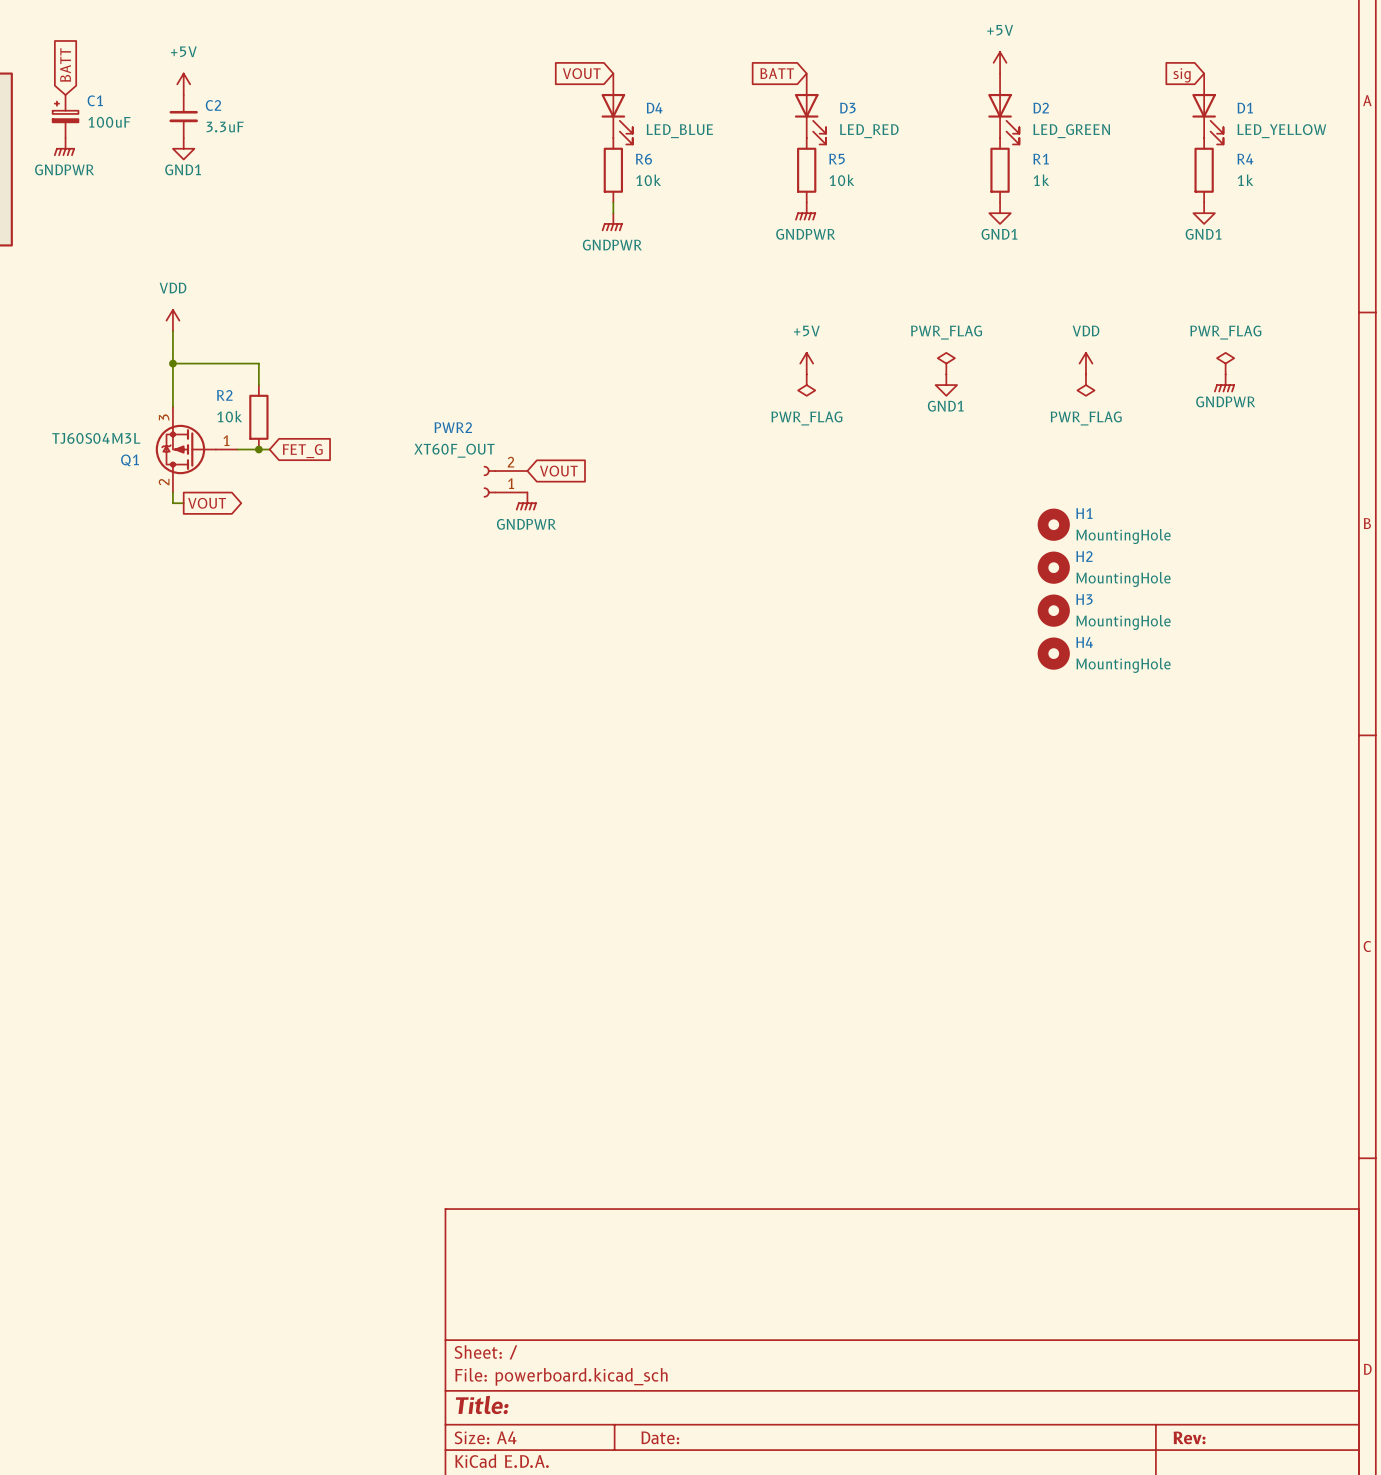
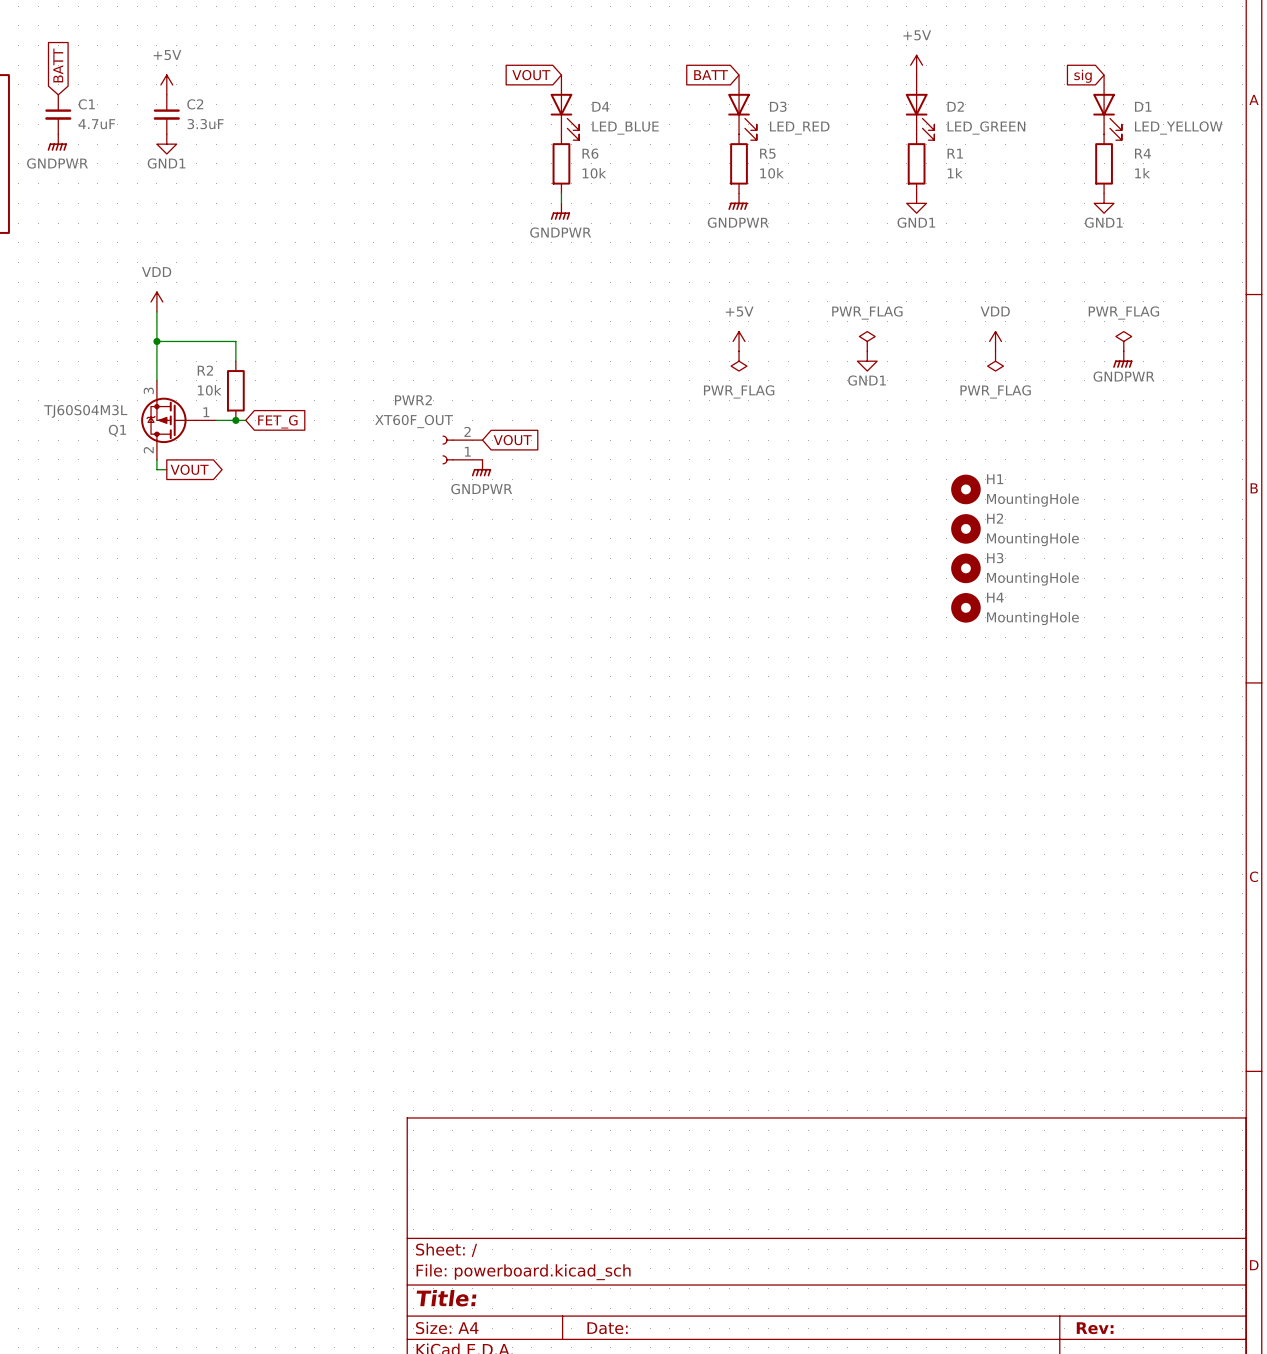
C1 symbol: [52, 95, 79, 139] -> [45, 94, 72, 135]
C1 value: 100uF (109, 122) -> 4.7uF (96, 124)

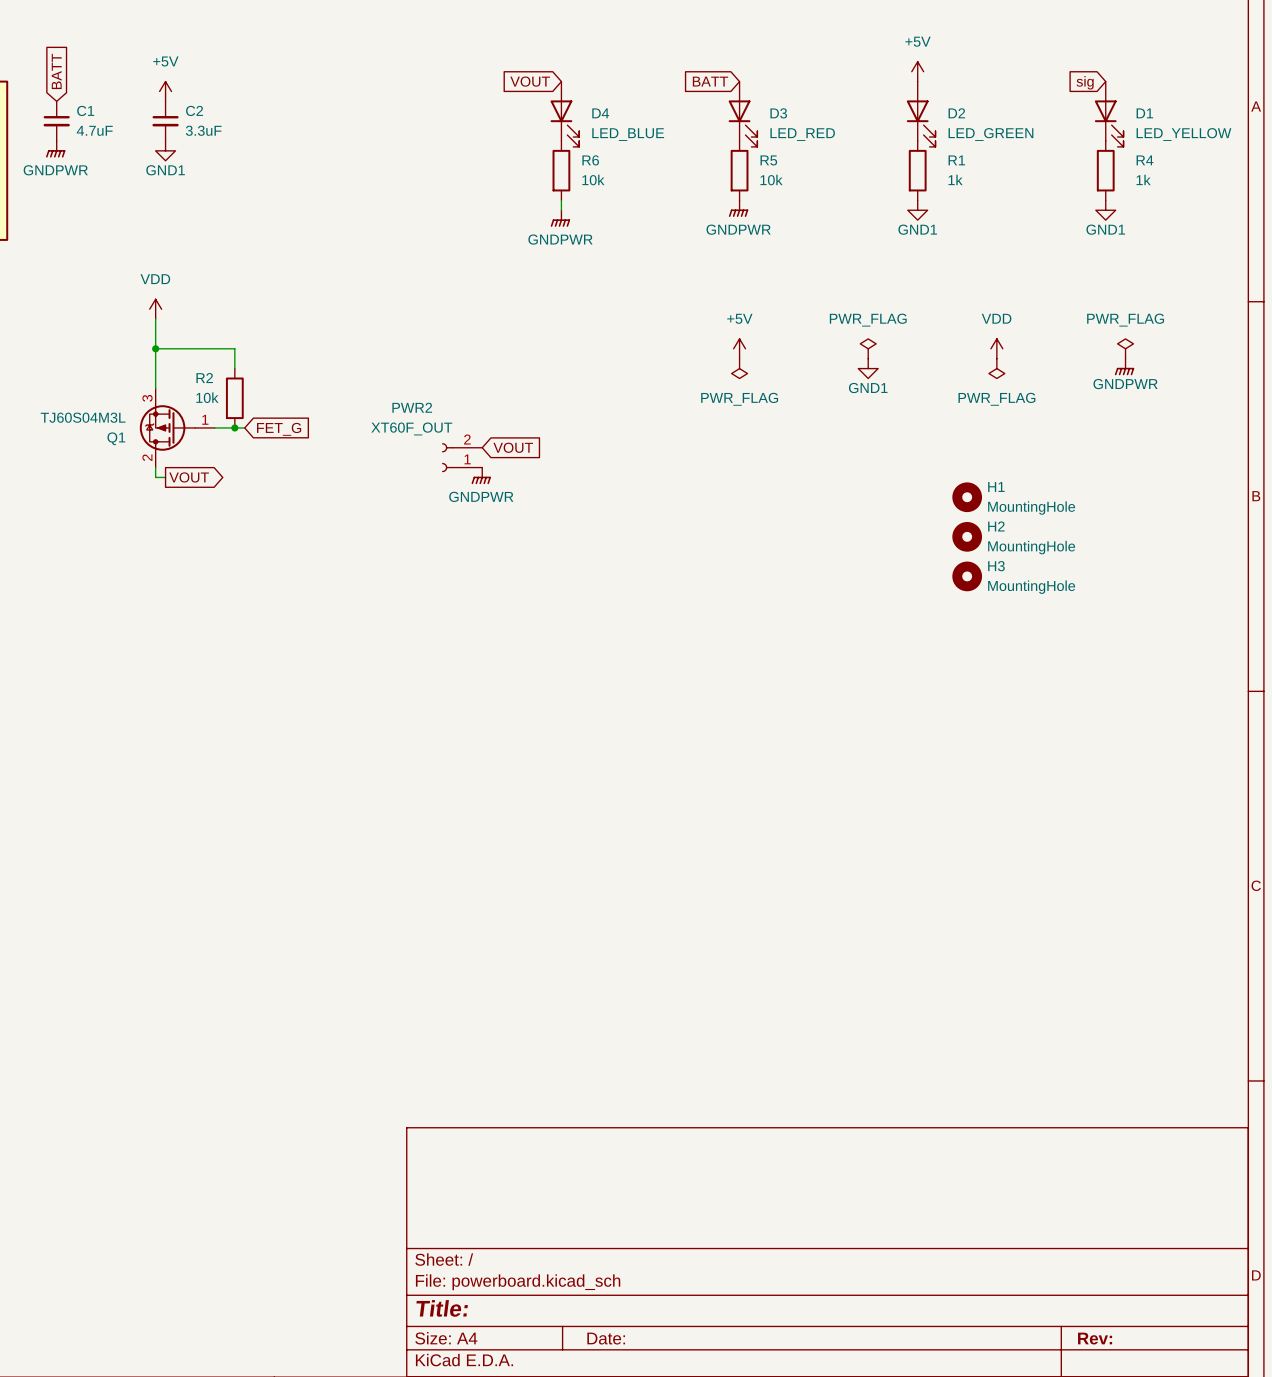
H4: MountingHole (965, 607) -> none

